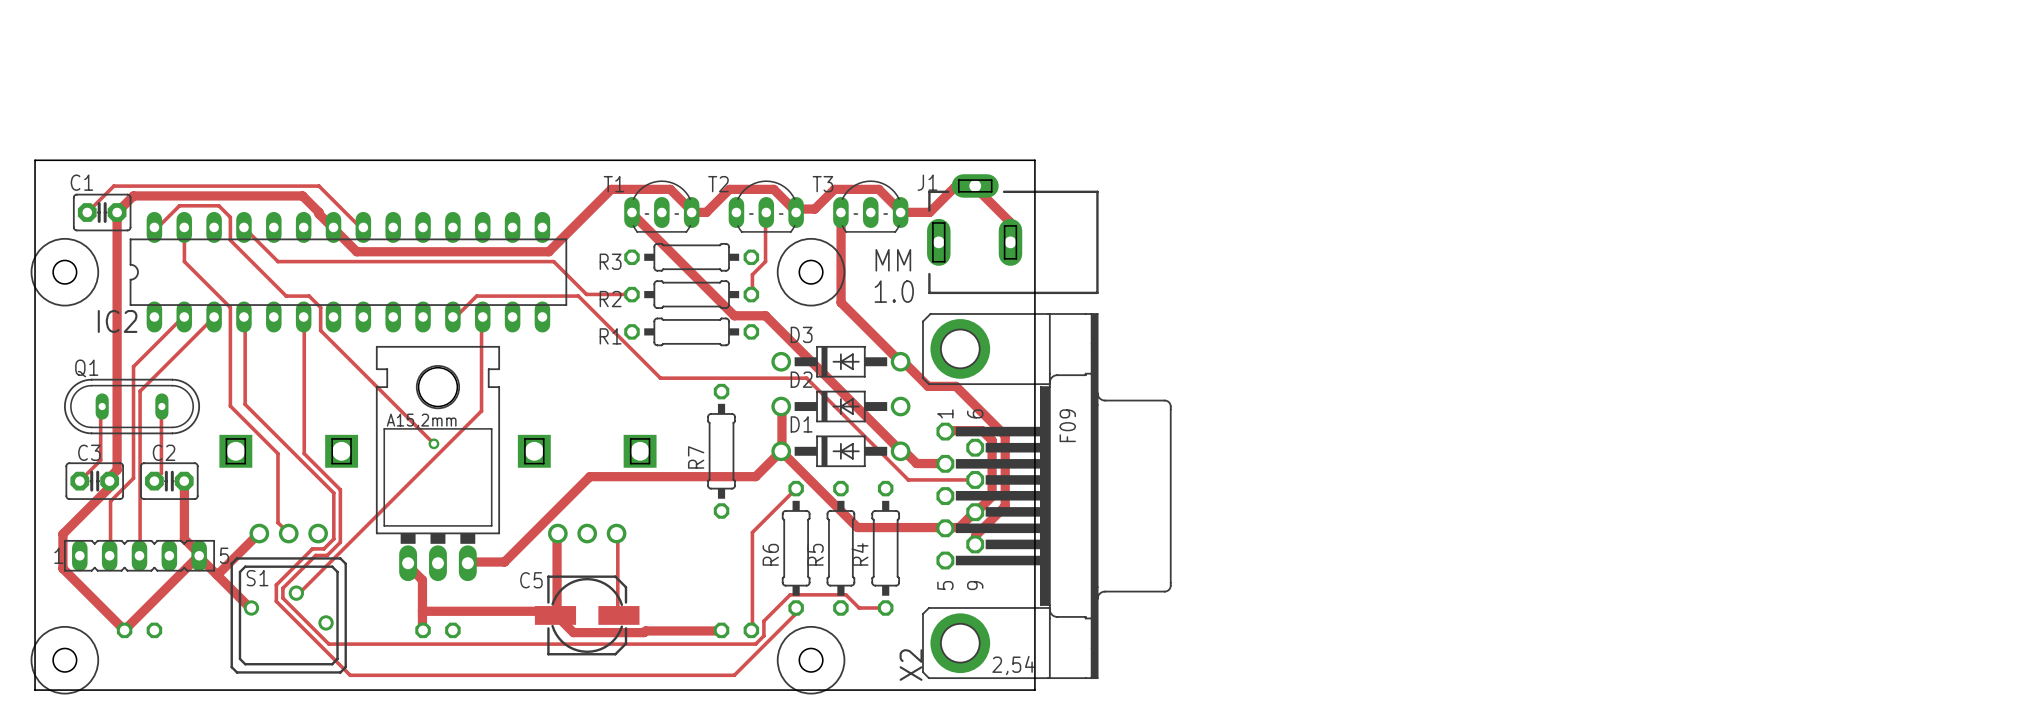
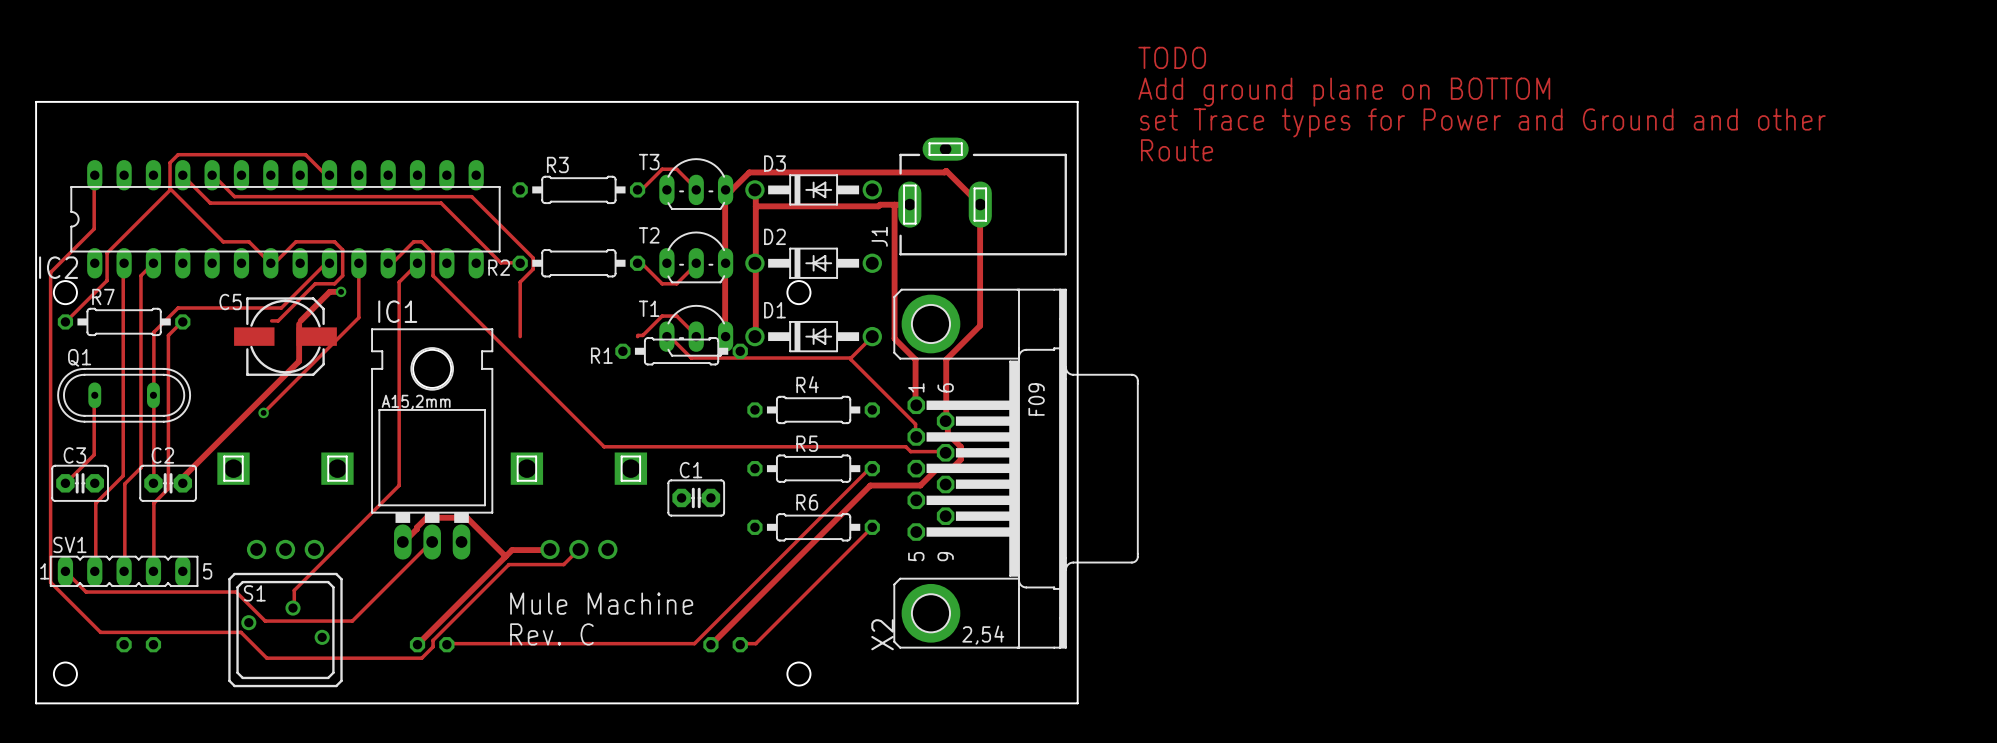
text: none -> TODO (1172, 57)
text: none -> Add ground plane on BOTTOM (1344, 92)
text: none -> set Trace types for Power and Ground and other (1482, 122)
text: none -> Route (1177, 150)
track: none -> (182, 175) (210, 203) (441, 203) (500, 262) (520, 263)
track: none -> (212, 175) (234, 196) (471, 196) (533, 257) (533, 269) (520, 282) (520, 336)
track: none -> (329, 175) (324, 174) (305, 154) (178, 154) (170, 162) (170, 190) (107, 253) (107, 280) (65, 321)
board edge: (35, 160) (1034, 160) (1034, 690) -> (36, 182) (36, 101) (1077, 101) (1077, 703) (1018, 703)
track: none -> (170, 188) (223, 241) (249, 241) (270, 263) (274, 262) (295, 241) (334, 241) (342, 249) (342, 275) (334, 283) (315, 283) (278, 320) (271, 320)
track: none -> (637, 189) (642, 188) (662, 169) (676, 169) (696, 189)
track: none -> (754, 189) (754, 336)
C1 name position: C1 (81, 182) -> C1 (691, 470)
track: none -> (894, 204) (894, 338) (915, 359) (916, 405)
track: none -> (909, 204) (755, 206)
J1 name rotation: 0° (927, 182) -> 90° counterclockwise (879, 236)
J1 name position: J1 (927, 182) -> J1 (879, 236)
T1 position: (661, 206) -> (696, 330)
T2 position: (766, 206) -> (696, 257)
T3 position: (870, 206) -> (696, 184)
track: (87, 212) (113, 186) (319, 186) (360, 227) (363, 227) -> none
C1 position: (102, 212) -> (696, 497)
track: (631, 212) (734, 315) (765, 315) (900, 451) (905, 452) (916, 463) (945, 463) -> none
track: (691, 212) (706, 212) (729, 189) (773, 189) (796, 212) (800, 209) (814, 209) (834, 189) (878, 189) (900, 212) (929, 212) (955, 186) (975, 185) (1010, 222) (1010, 242) -> none
track: (691, 212) (670, 189) (611, 189) (548, 251) (356, 251) (302, 195) (133, 195) (117, 212) (117, 470) (110, 476) (108, 488) (62, 534) (62, 568) (124, 630) (199, 555) -> none
track: (766, 212) (765, 261) (752, 274) (751, 294) -> none
track: (840, 212) (841, 302) (900, 361) (905, 363) (928, 386) (955, 386) (1005, 435) (1005, 506) (975, 535) (975, 544) -> none
track: (154, 227) (158, 227) (179, 205) (218, 205) (230, 217) (230, 240) (286, 296) (309, 296) (320, 307) (320, 330) (433, 443) -> none
track: (184, 227) (184, 261) (230, 307) (230, 406) (277, 453) (277, 522) (288, 533) -> none
track: (243, 227) (277, 261) (553, 261) (586, 294) (631, 294) -> none
J1 position: (1012, 234) -> (982, 196)
drawing: [30, 237, 100, 307] -> none
drawing: [776, 237, 846, 307] -> none
track: none -> (124, 263) (123, 475) (95, 503) (94, 571)
track: none -> (153, 263) (140, 275) (140, 467) (124, 483) (124, 571)
track: none -> (329, 263) (324, 264) (281, 308) (178, 308) (153, 332) (153, 483)
track: none -> (358, 263) (358, 317) (263, 412)
track: none -> (388, 263) (392, 262) (413, 241) (421, 241) (433, 253) (433, 275) (604, 446) (905, 446) (910, 451) (945, 452)
track: none -> (637, 263) (642, 264) (662, 283) (676, 283) (696, 263)
R3 position: (691, 257) -> (578, 189)
text: MM (893, 260) -> none
R3 name position: R3 (610, 261) -> R3 (557, 164)
track: none -> (341, 291) (329, 291) (300, 320)
via: none -> (341, 291)
IC2 position: (348, 272) -> (285, 219)
text: 1.0 (894, 291) -> none
R2 position: (691, 294) -> (578, 263)
track: none -> (182, 321) (168, 335) (168, 488) (153, 503) (153, 571)
track: none -> (299, 324) (299, 361) (182, 477) (182, 483)
track: (184, 316) (133, 366) (133, 478) (110, 501) (109, 555) -> none
track: (214, 316) (140, 391) (139, 555) -> none
track: (243, 316) (245, 404) (333, 493) (333, 539) -> (417, 263) (399, 282) (399, 485) (329, 554)
track: (303, 316) (304, 453) (340, 489) (340, 542) (327, 555) (315, 555) (282, 588) (282, 598) (328, 644) -> (94, 175) (94, 228) (50, 272) (50, 582) (100, 632) (241, 632) (266, 658) (324, 658)
track: (452, 316) (456, 315) (476, 296) (578, 296) (660, 378) (806, 378) (908, 479) (975, 479) -> none
track: (482, 316) (481, 411) (300, 591) (297, 591) -> (320, 564) (294, 590) (294, 606)
track: none -> (637, 336) (642, 335) (662, 316) (676, 316) (696, 336)
track: none -> (666, 336) (670, 337) (691, 358) (851, 358)
track: none -> (872, 336) (851, 358)
track: none -> (851, 358) (915, 424) (916, 436)
D3 position: (840, 361) -> (813, 189)
track: none -> (94, 395) (94, 454) (65, 483)
via: none -> (263, 412)
track: (102, 406) (100, 460) (79, 481) -> none
Q1 position: (132, 406) -> (124, 395)
track: (161, 406) (161, 473) (154, 481) -> none
track: (781, 406) (781, 451) -> none
D2 position: (840, 406) -> (813, 263)
IC1: none -> (432, 444)
track: (945, 431) (982, 430) (992, 440) (992, 496) (959, 527) (857, 527) (781, 451) -> none
via: (433, 443) -> none
R7 rotation: 0° (721, 451) -> 90° clockwise (124, 321)
R7 position: (721, 451) -> (124, 321)
track: (781, 451) (755, 476) (589, 476) (504, 562) (467, 563) -> none
D1 position: (840, 451) -> (813, 336)
track: none -> (872, 468) (868, 469) (694, 643) (446, 644)
part: (437, 463) -> none
C3 position: (94, 481) -> (80, 483)
C2 position: (169, 481) -> (168, 483)
track: (184, 481) (184, 539) (199, 555) -> none
track: (796, 488) (752, 532) (752, 629) -> (872, 527) (755, 643) (741, 643)
X2 position: (1046, 496) -> (1016, 468)
track: none -> (402, 541) (426, 517) (466, 517) (505, 556)
track: none -> (432, 541) (352, 621) (265, 621) (236, 592) (86, 592) (65, 571)
track: (259, 533) (217, 575) -> none
track: (616, 533) (618, 615) -> none
track: (557, 534) (557, 611) (555, 615) -> (549, 550) (512, 550) (417, 644)
track: (323, 548) (312, 548) (276, 585) (276, 601) (350, 675) (734, 675) (795, 614) (796, 607) -> none
R6 rotation: 0° (796, 548) -> 90° clockwise (813, 527)
R5 rotation: 0° (840, 548) -> 90° clockwise (813, 468)
R5 position: (840, 548) -> (813, 468)
R4 rotation: 0° (885, 548) -> 90° clockwise (813, 409)
R4 position: (885, 548) -> (813, 409)
SV1: none -> (124, 571)
part: (139, 555) -> none
track: (199, 555) (251, 607) -> none
track: (408, 563) (409, 566) (422, 580) (423, 630) -> none
text: none -> Mule Machine (601, 603)
track: (885, 607) (859, 607) (845, 594) (790, 594) (763, 621) (763, 635) (755, 644) (427, 644) -> (578, 549) (563, 564) (508, 564) (433, 640) (433, 646) (421, 658)
track: (422, 611) (552, 611) (555, 615) -> none
track: (555, 615) (573, 632) (721, 630) -> (725, 336) (725, 190) (731, 190) (749, 172) (944, 172) (946, 170) (980, 204) (980, 325) (946, 359) (945, 421) (947, 422) (947, 433) (960, 446) (960, 459) (951, 469) (936, 469) (920, 485) (870, 485) (710, 644)
C5 position: (587, 615) -> (285, 336)
text: none -> Rev. C (551, 634)
drawing: [30, 625, 100, 695] -> none
drawing: [776, 625, 846, 695] -> none

